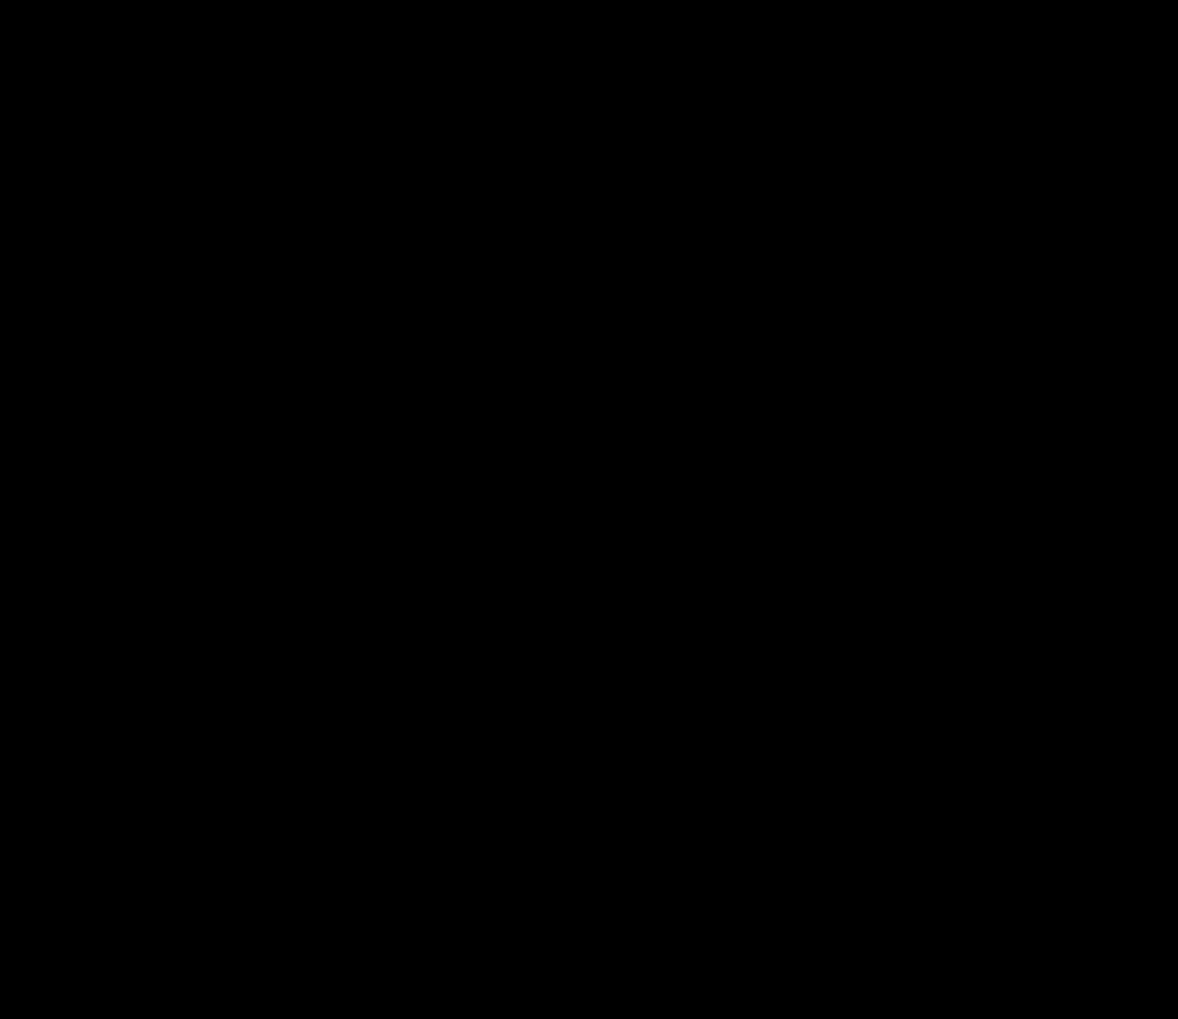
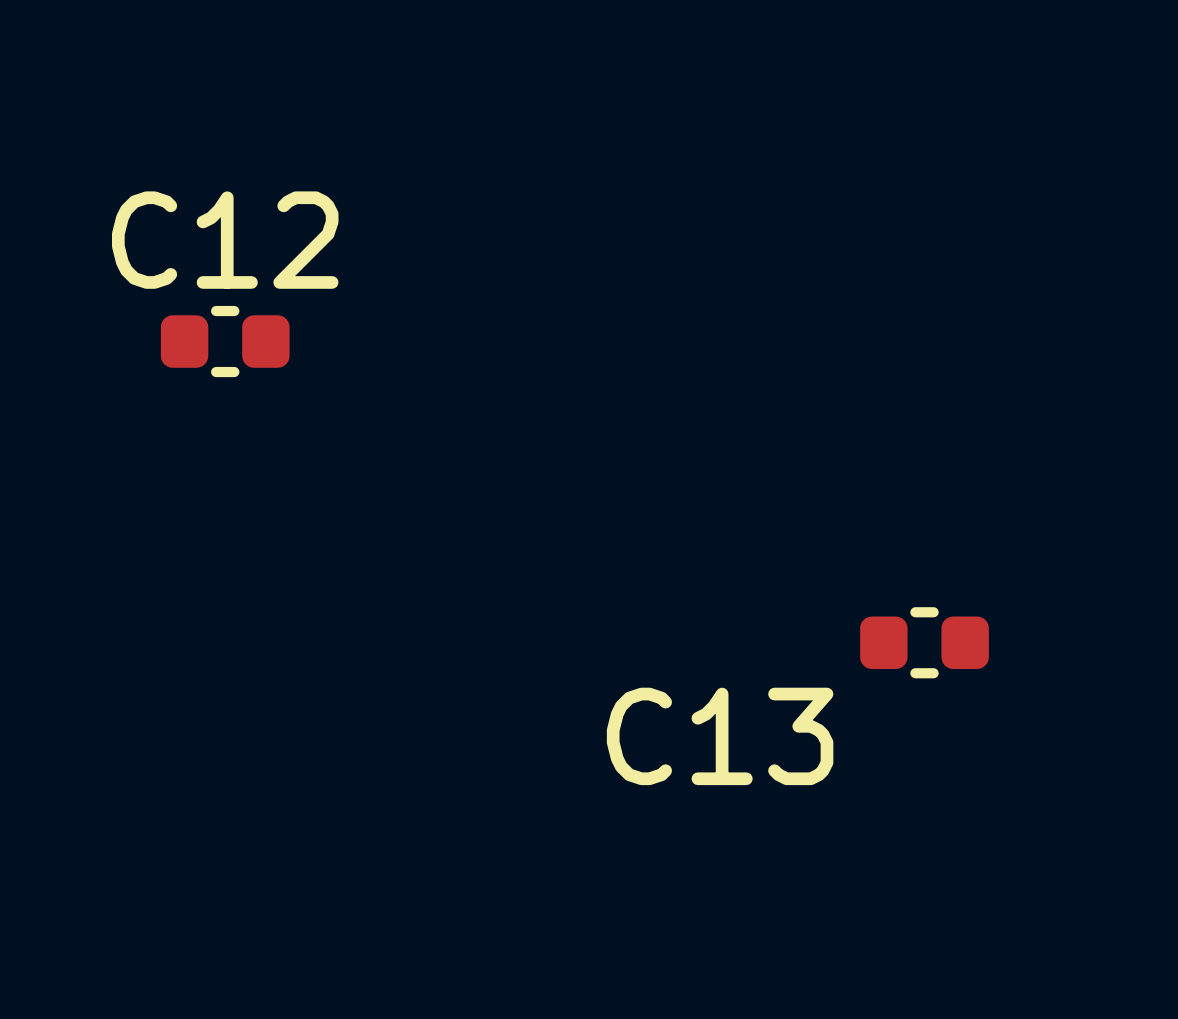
C12: none -> (225, 341)
C13: none -> (924, 642)

